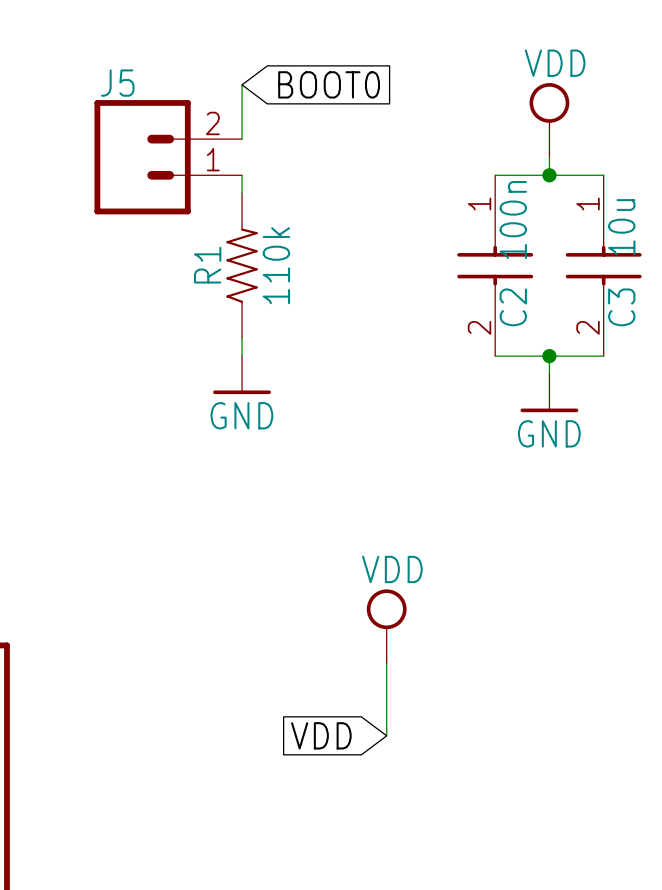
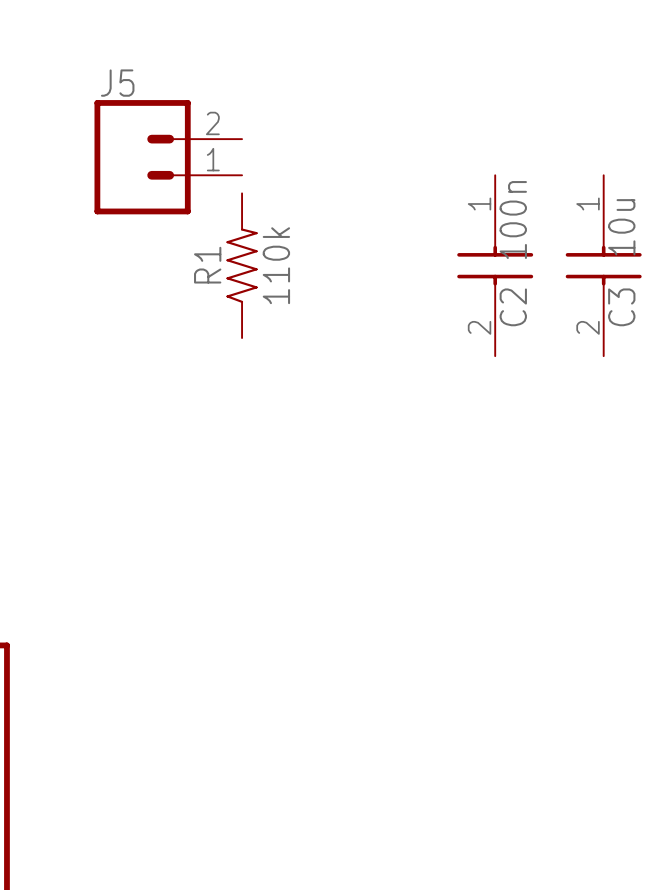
wire: (242, 84) (242, 139) -> none
global label: BOOT0 (329, 84) -> none
power symbol: VDD (549, 120) -> none
wire: (549, 157) (549, 175) -> none
wire: (242, 175) (242, 193) -> none
wire: (495, 175) (603, 175) -> none
junction: (549, 175) -> none
wire: (242, 338) (242, 356) -> none
wire: (495, 356) (603, 356) -> none
wire: (549, 356) (549, 374) -> none
junction: (549, 356) -> none
power symbol: GND (242, 375) -> none
power symbol: GND (549, 393) -> none
power symbol: VDD (386, 626) -> none
wire: (386, 663) (386, 735) -> none
global label: VDD (321, 735) -> none

